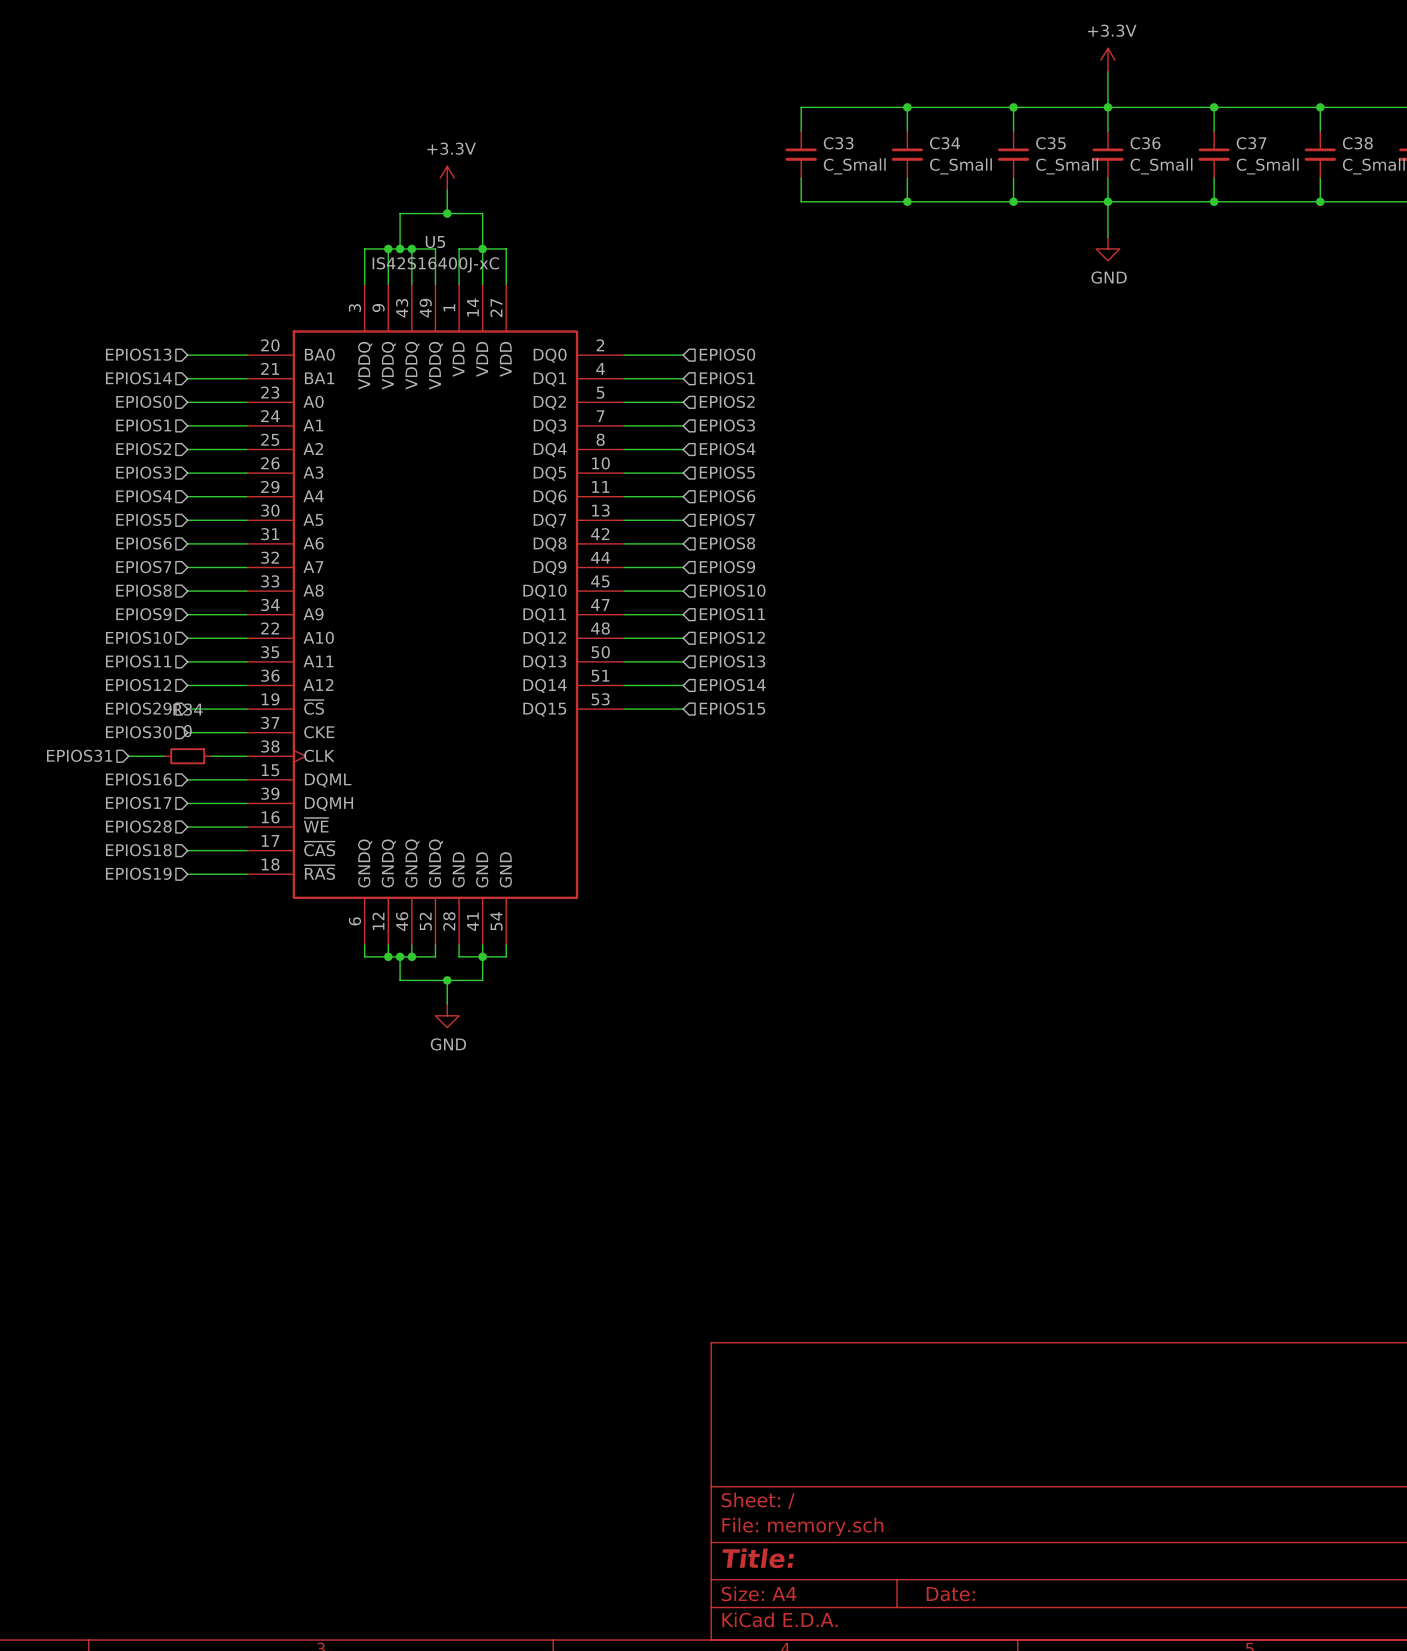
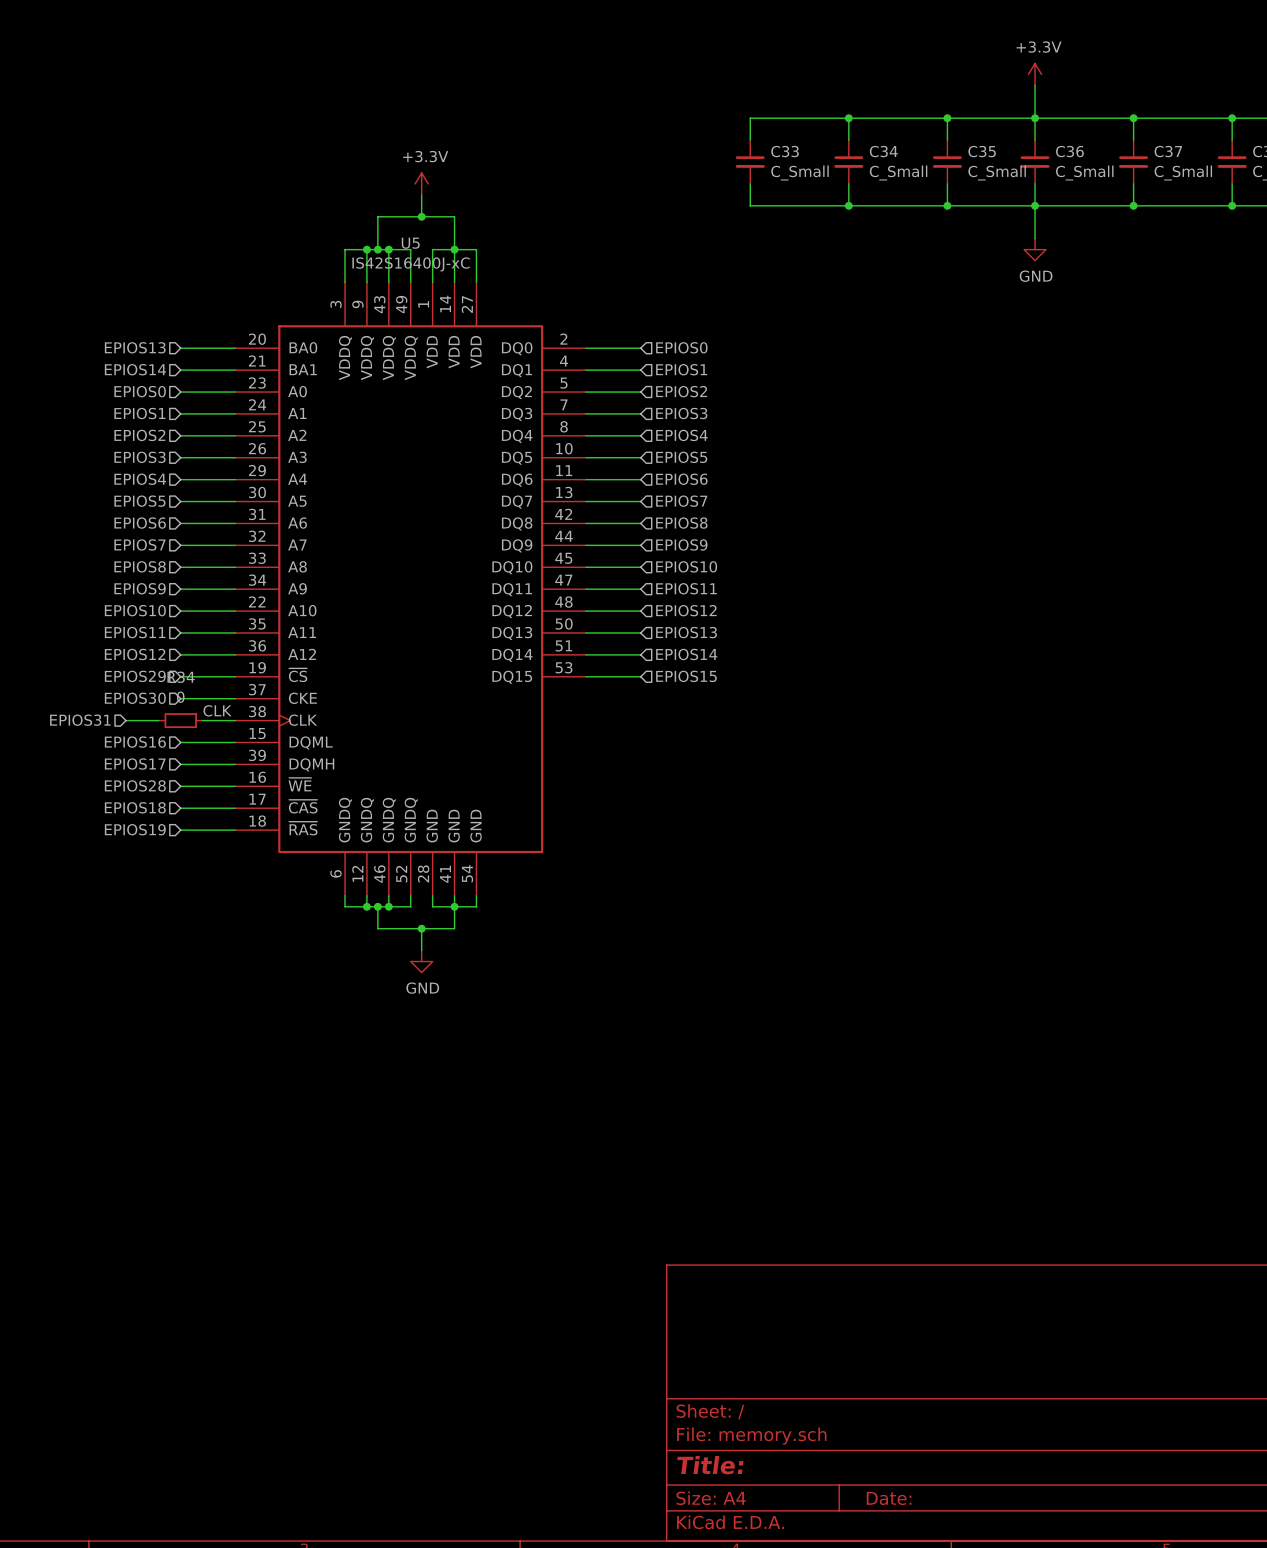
label: none -> CLK (217, 710)

